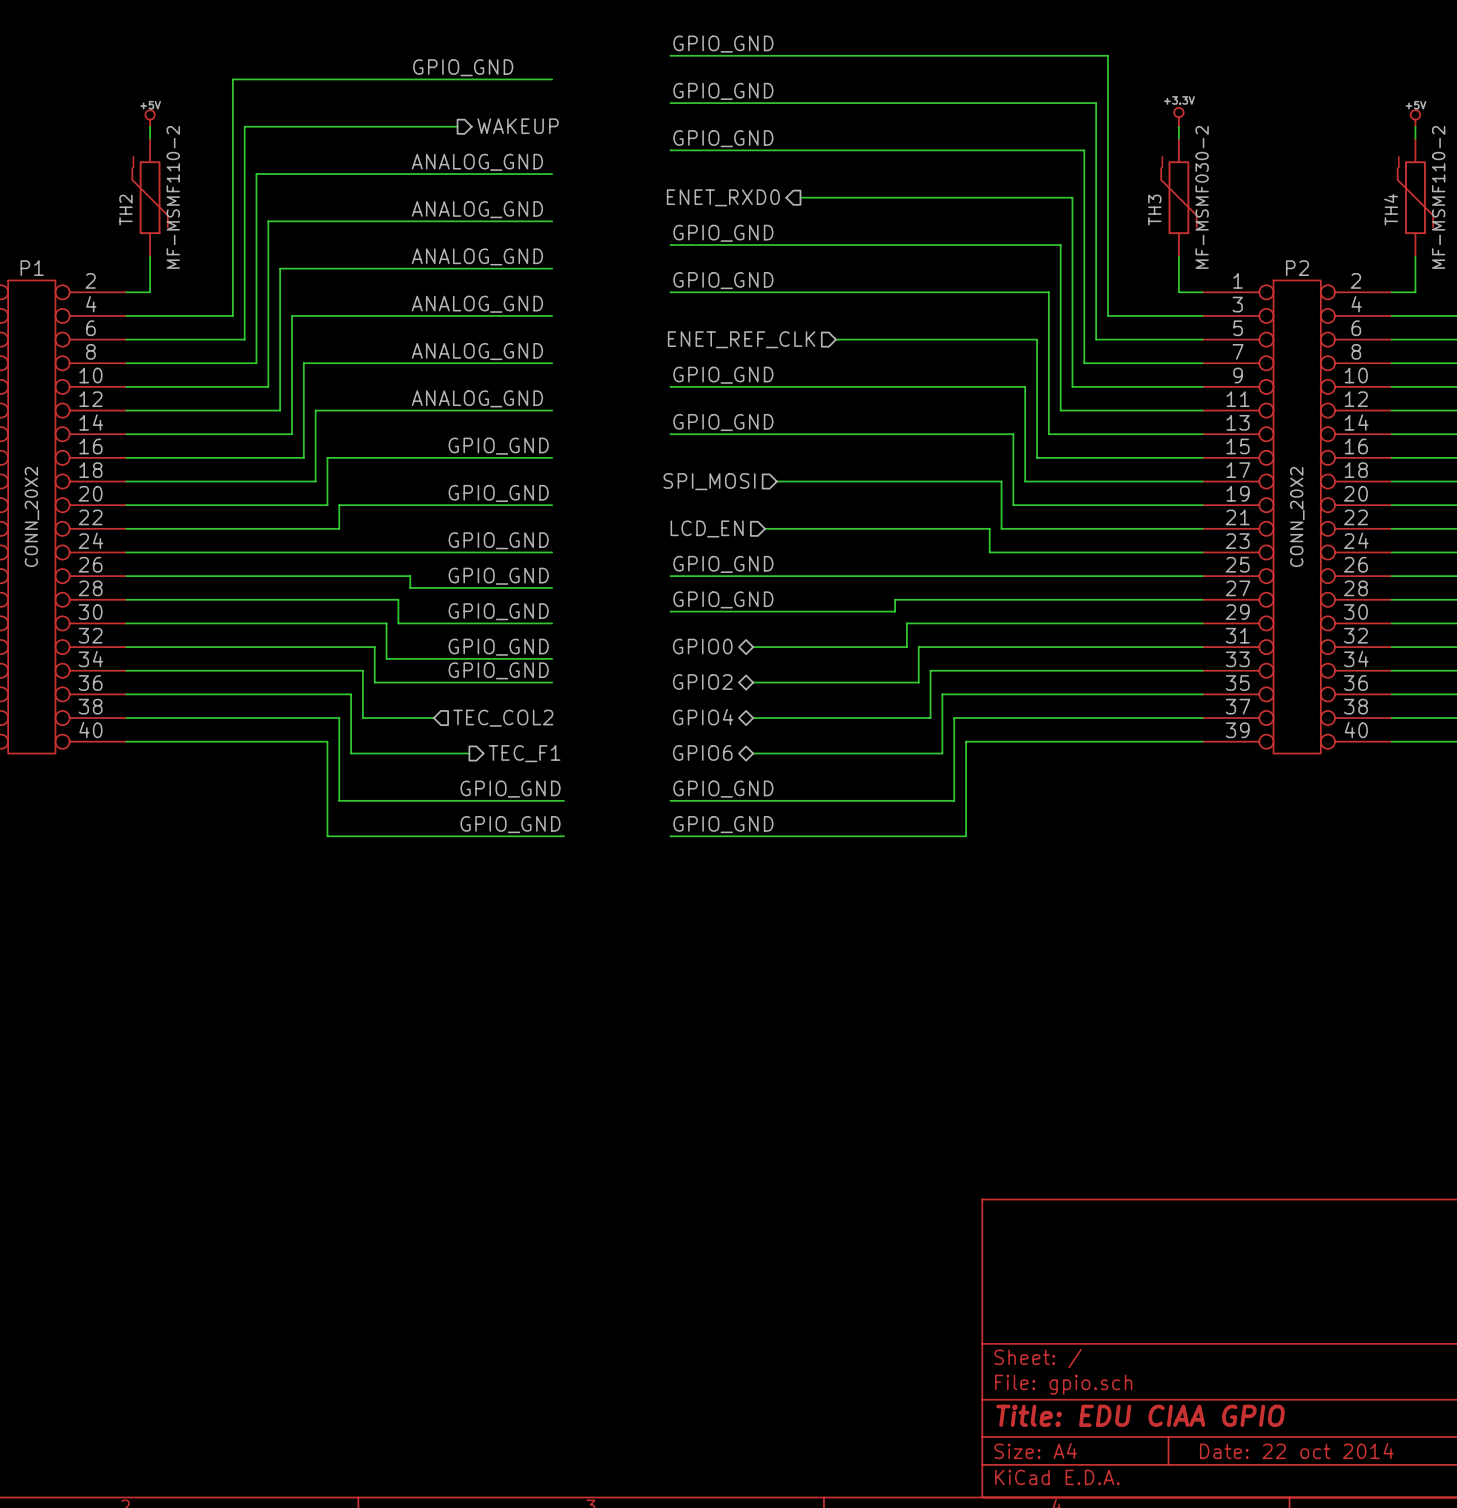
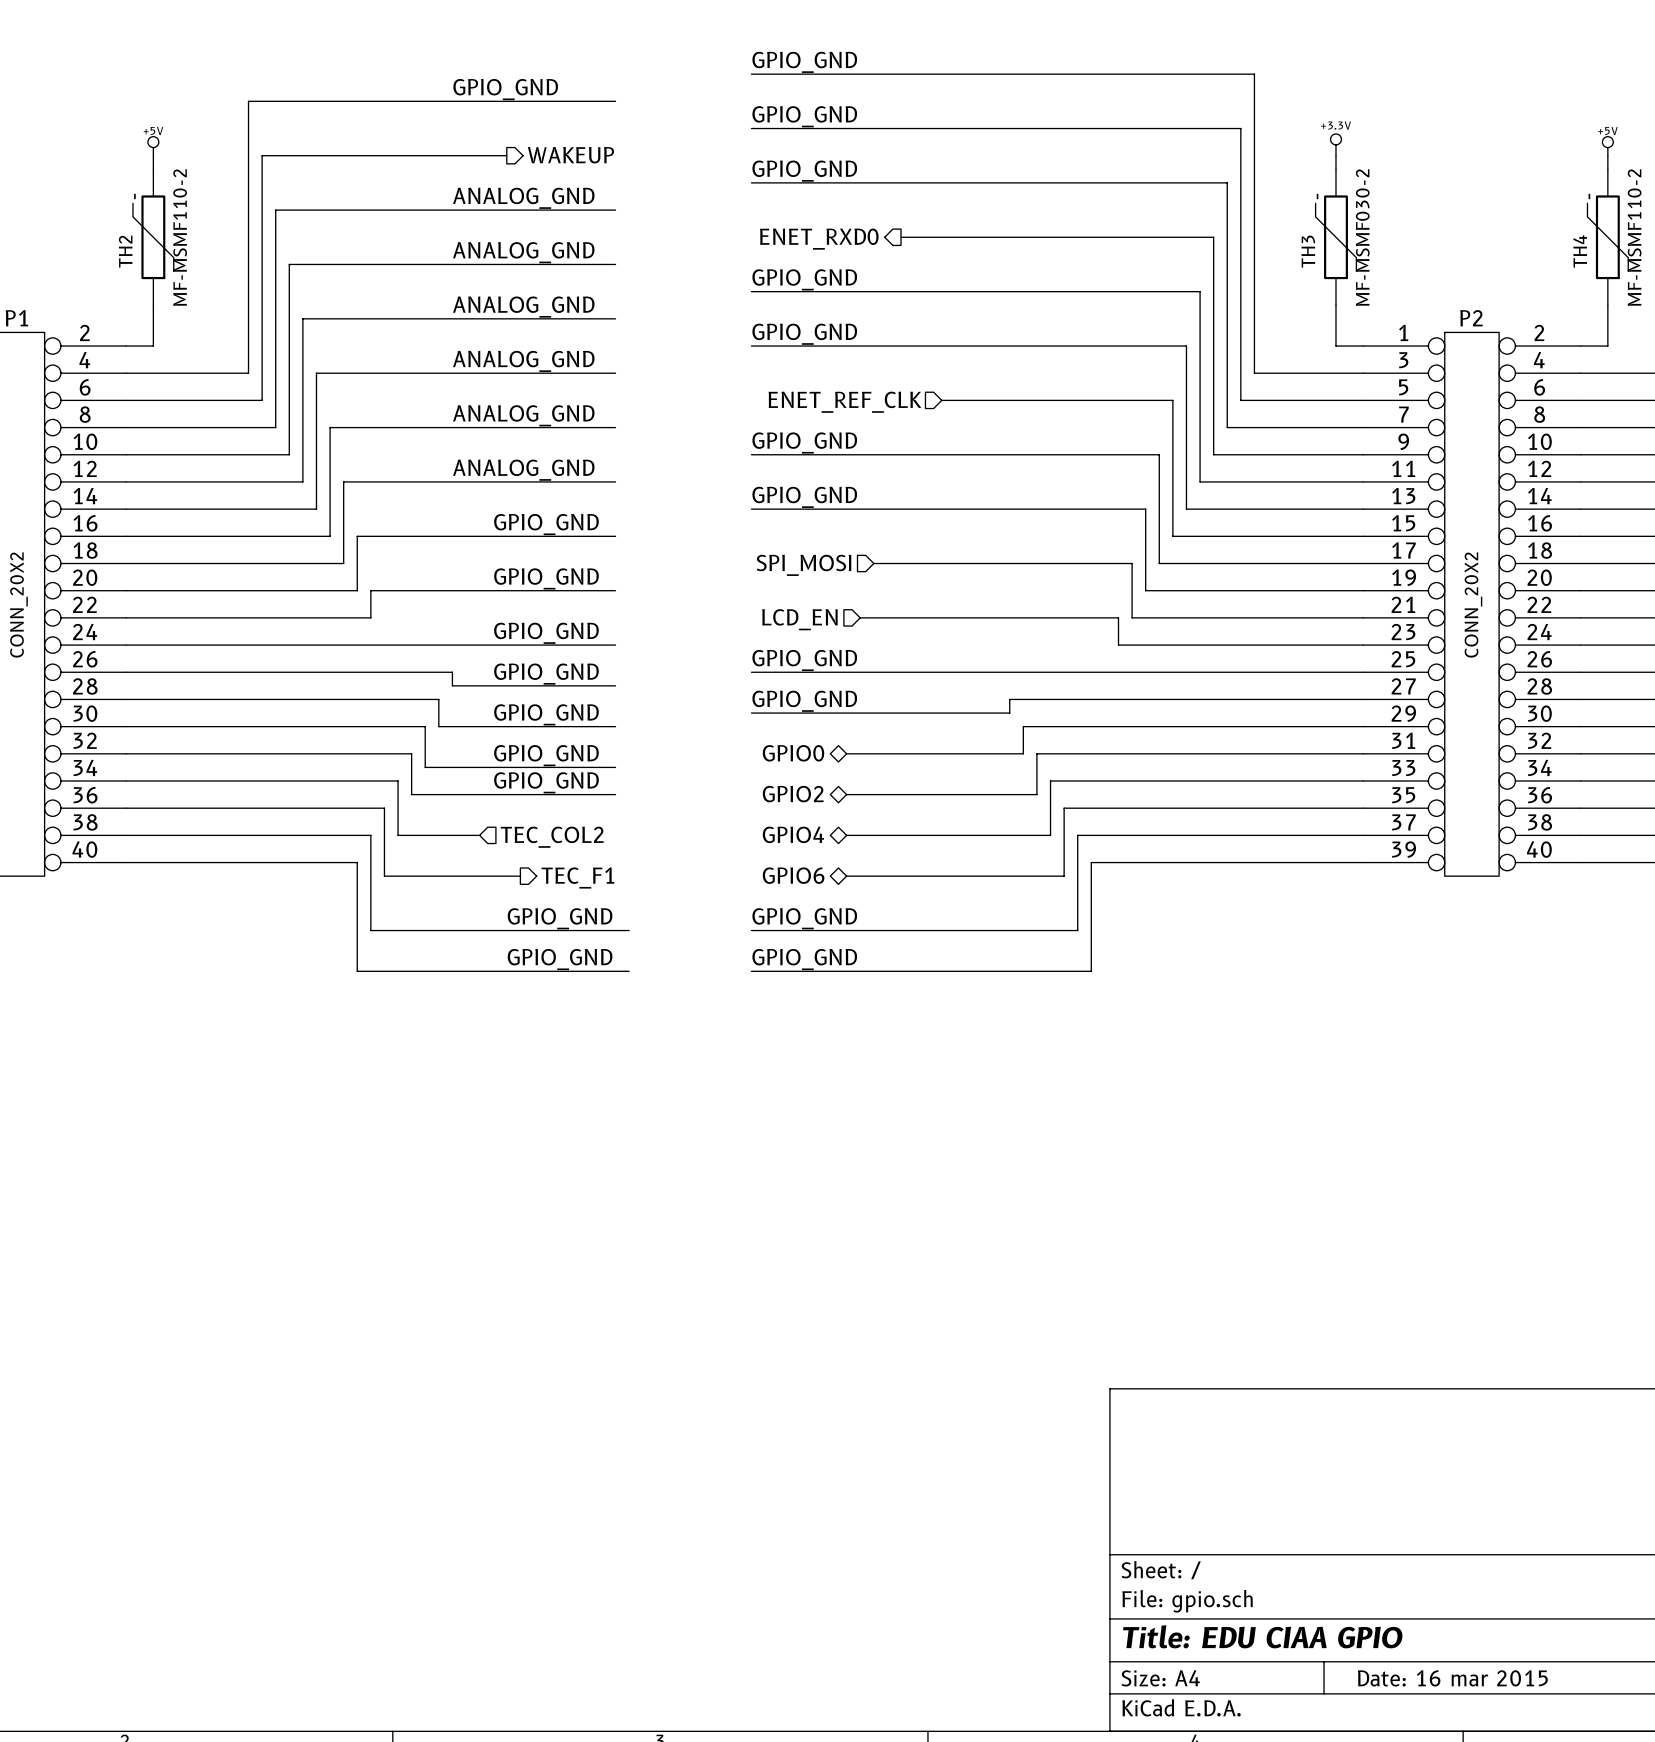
title block: Date: 22 oct 2014 (1296, 1451) -> Date: 16 mar 2015 (1452, 1678)

